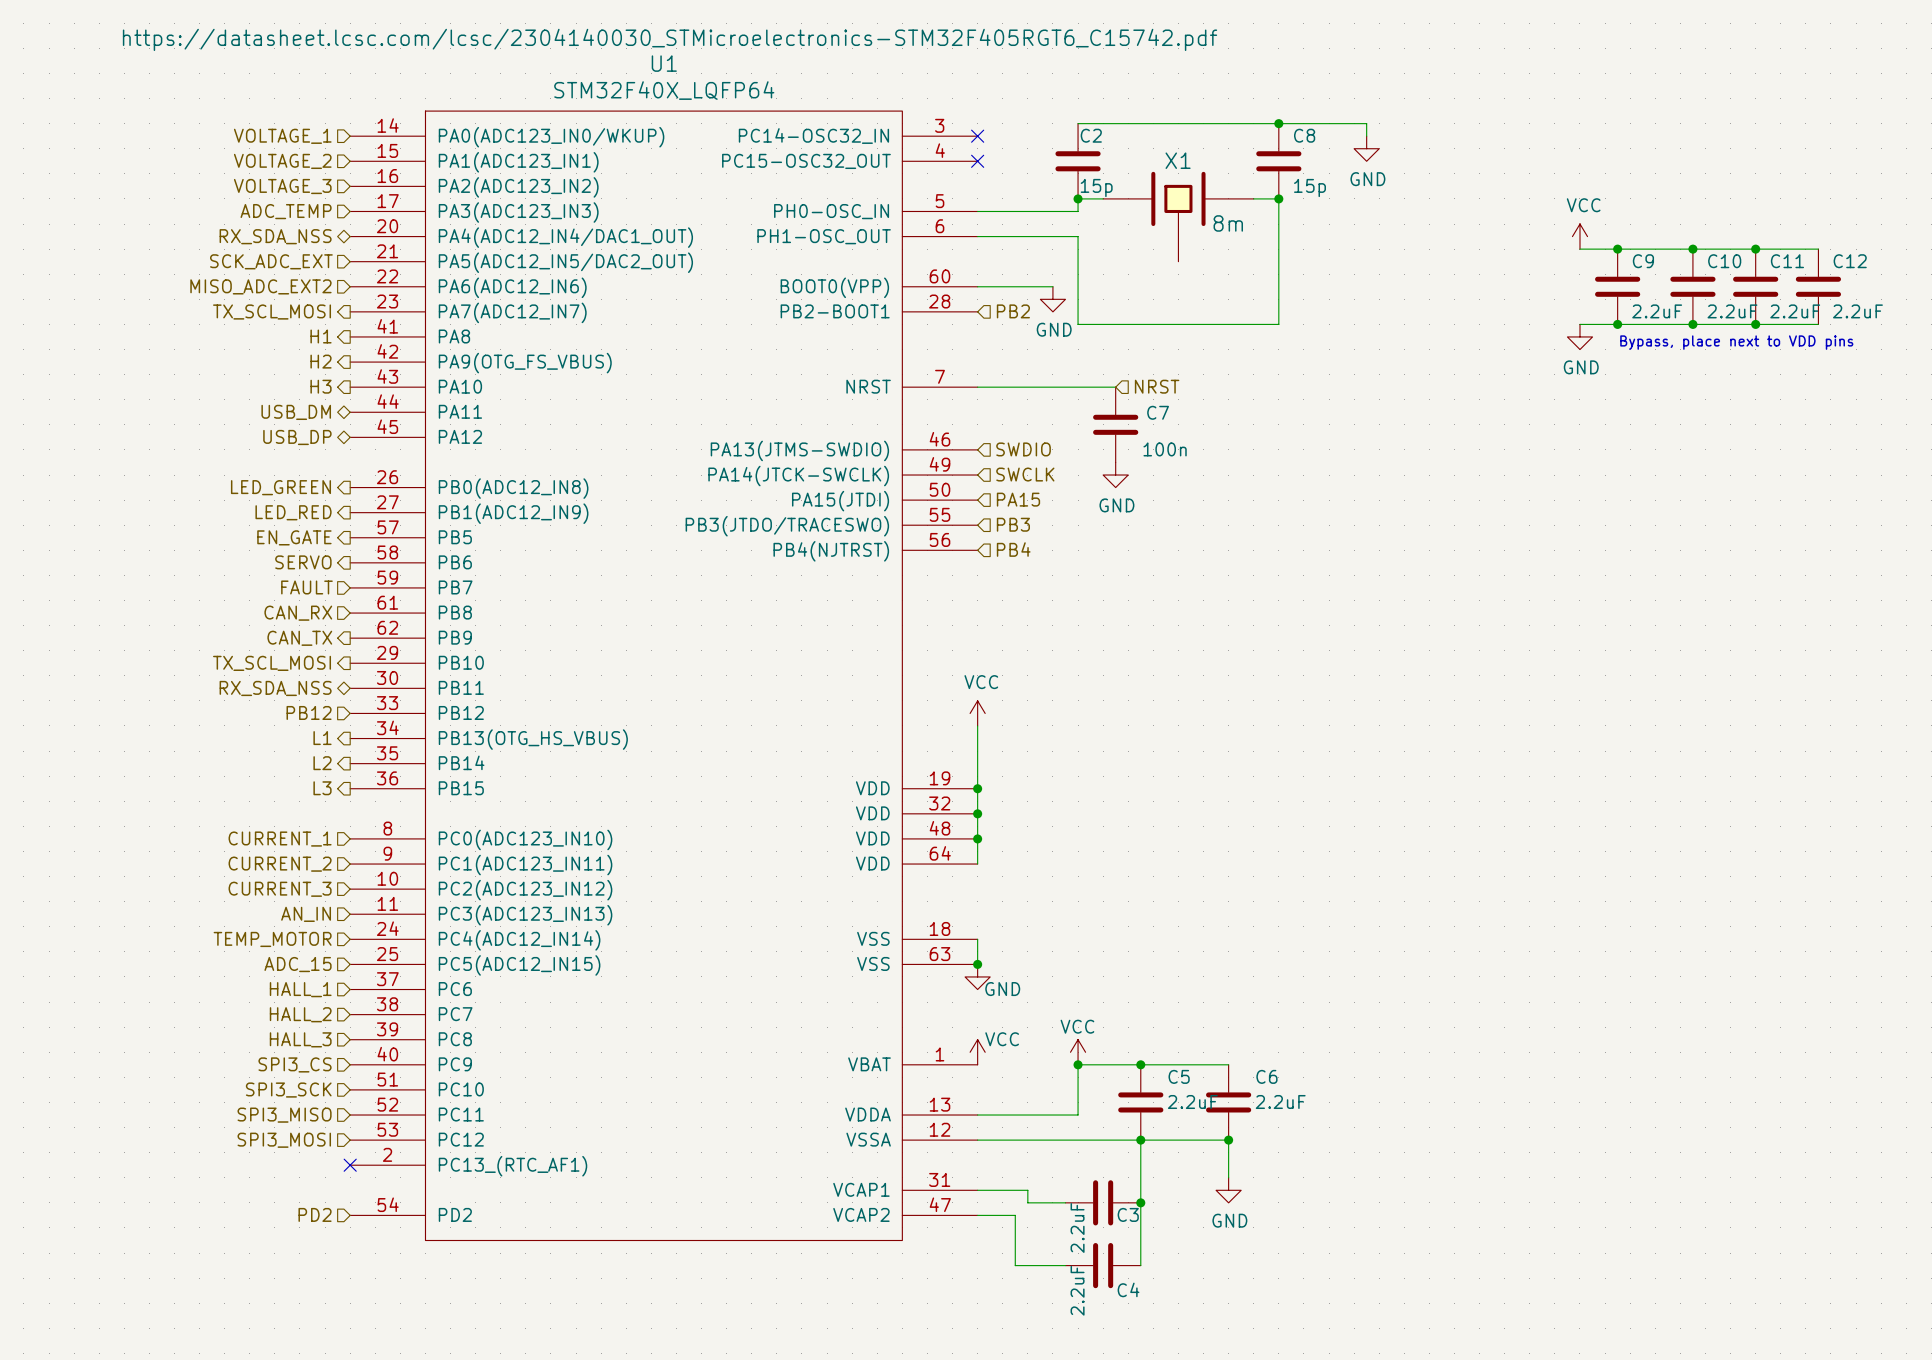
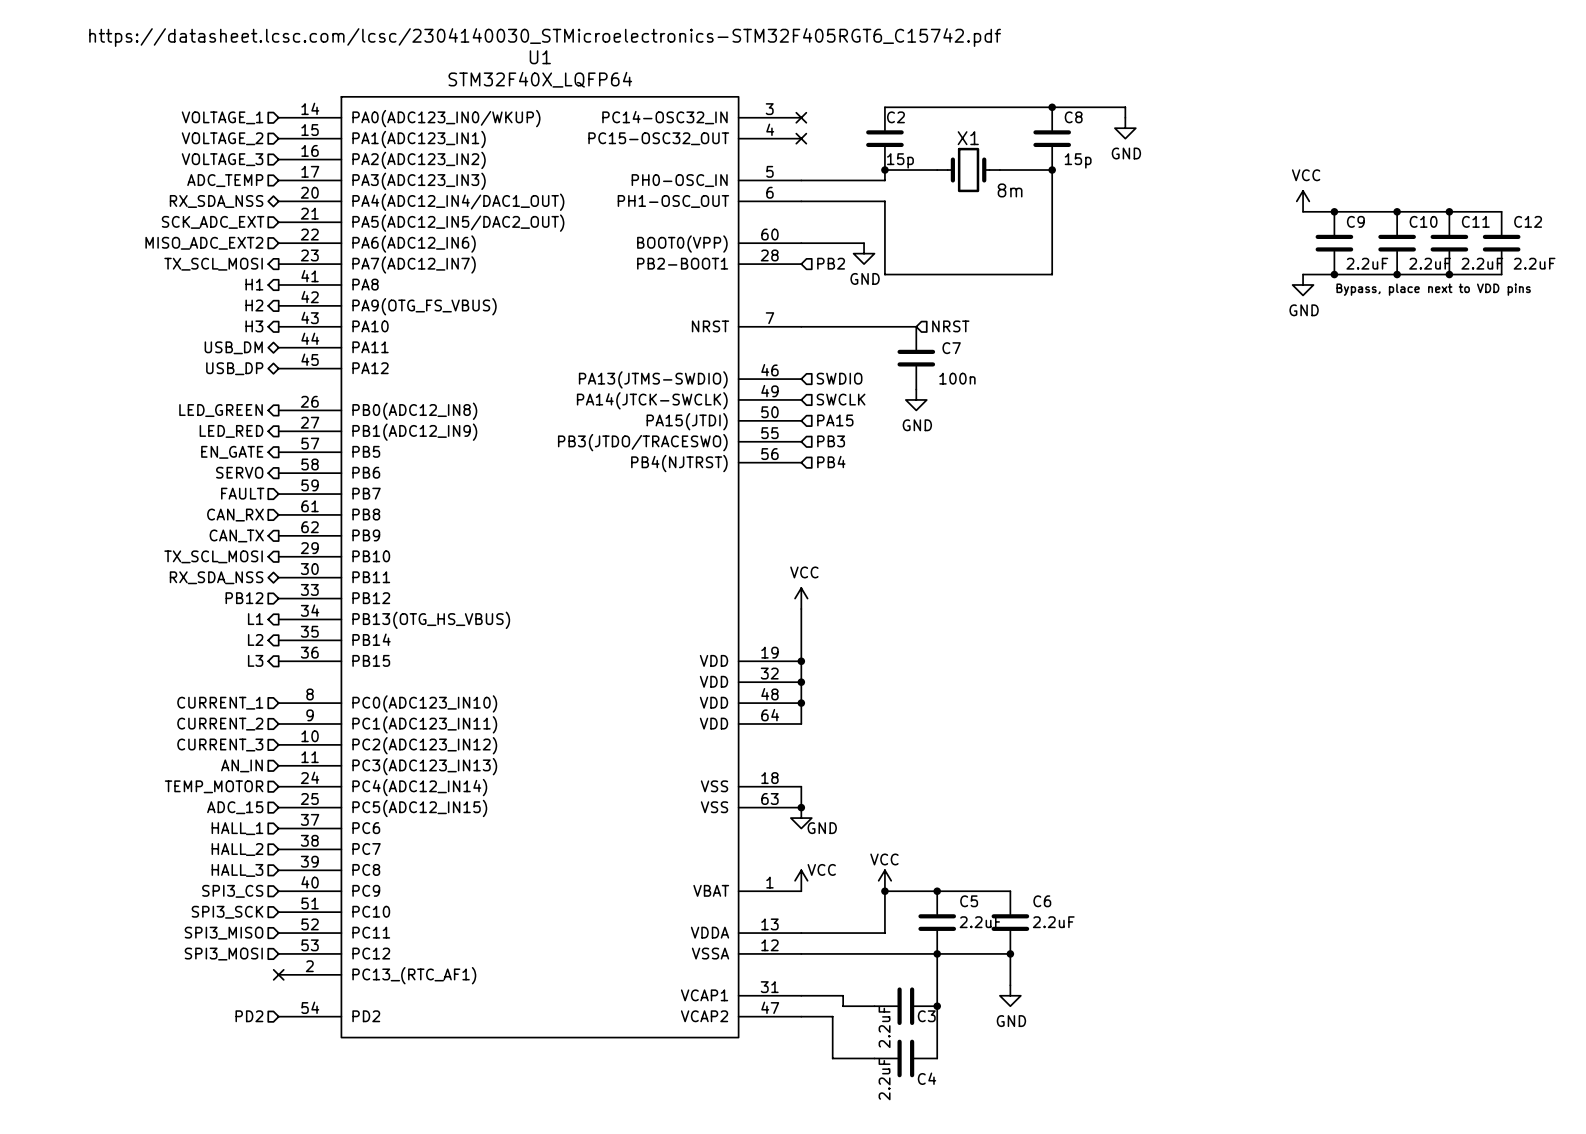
X1 symbol: [1103, 171, 1254, 262] -> [937, 147, 1000, 193]

